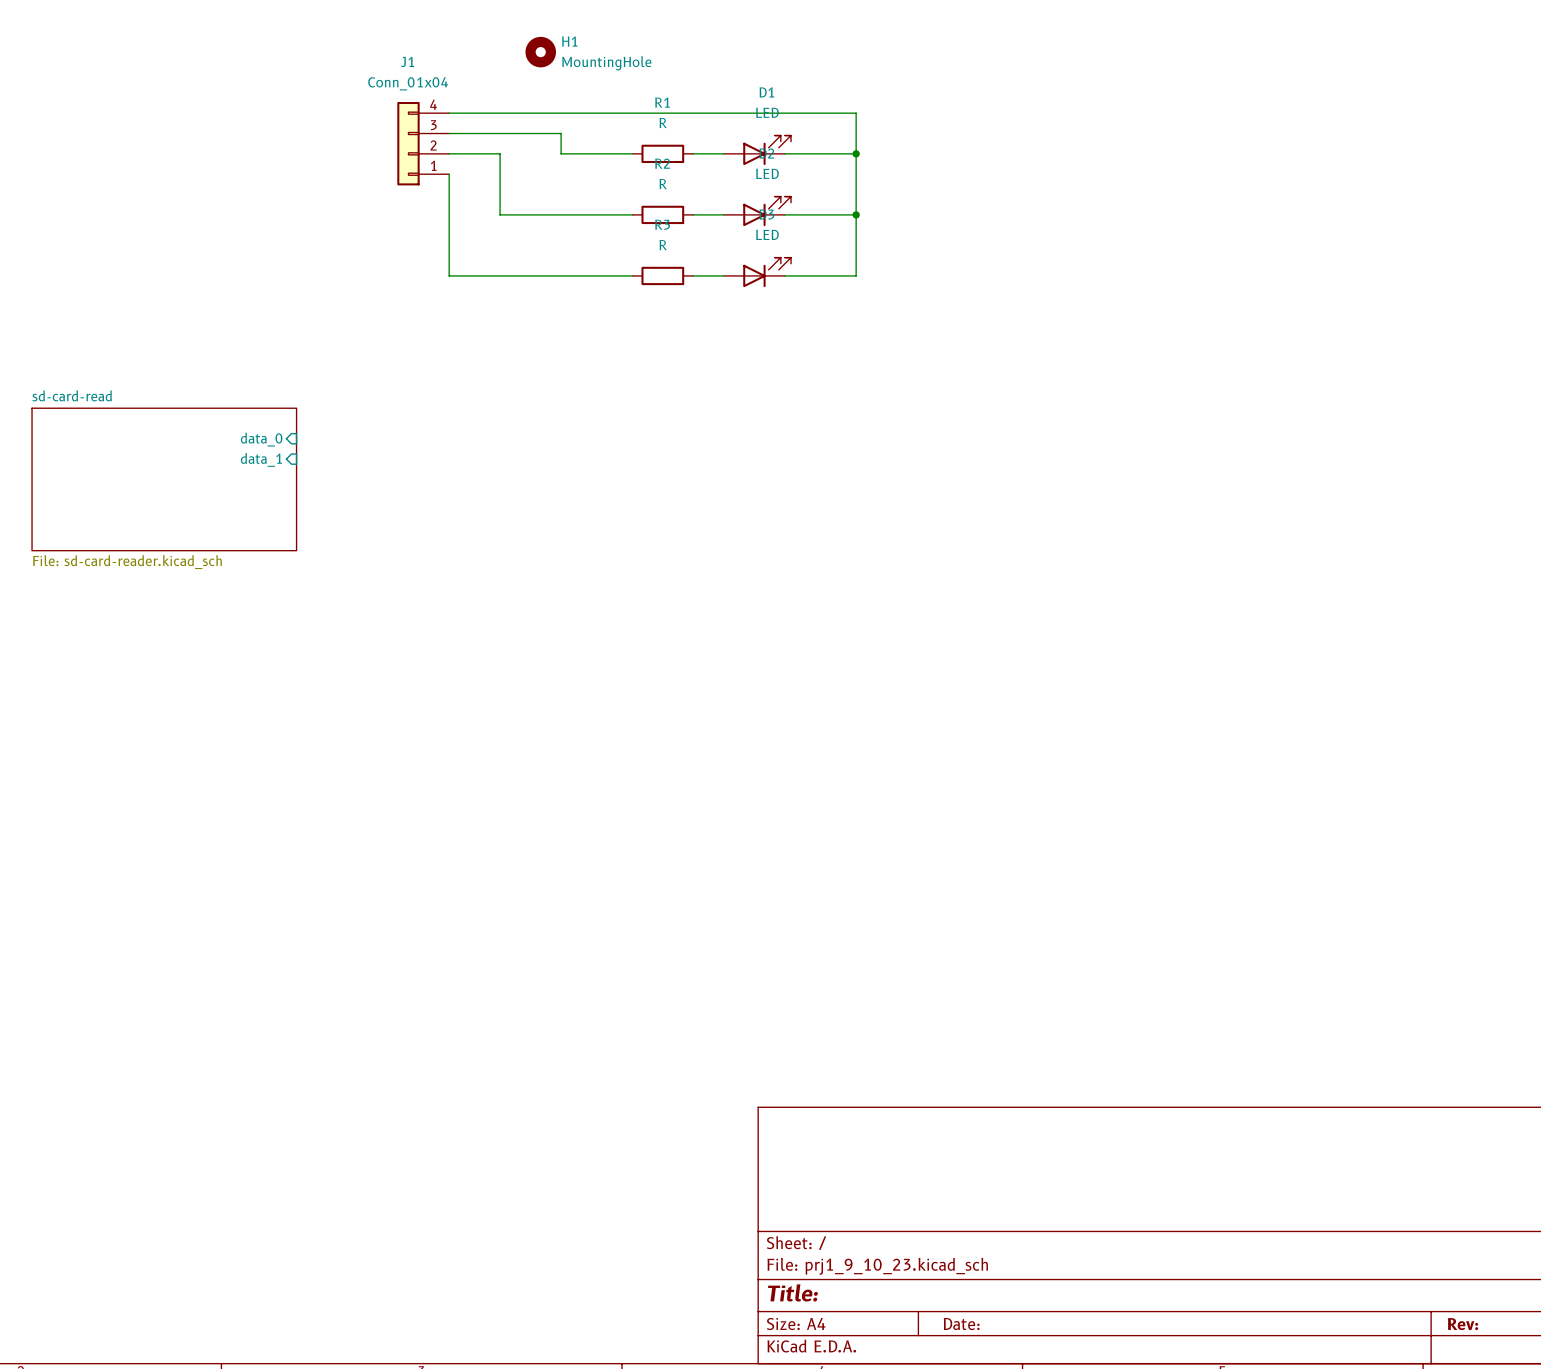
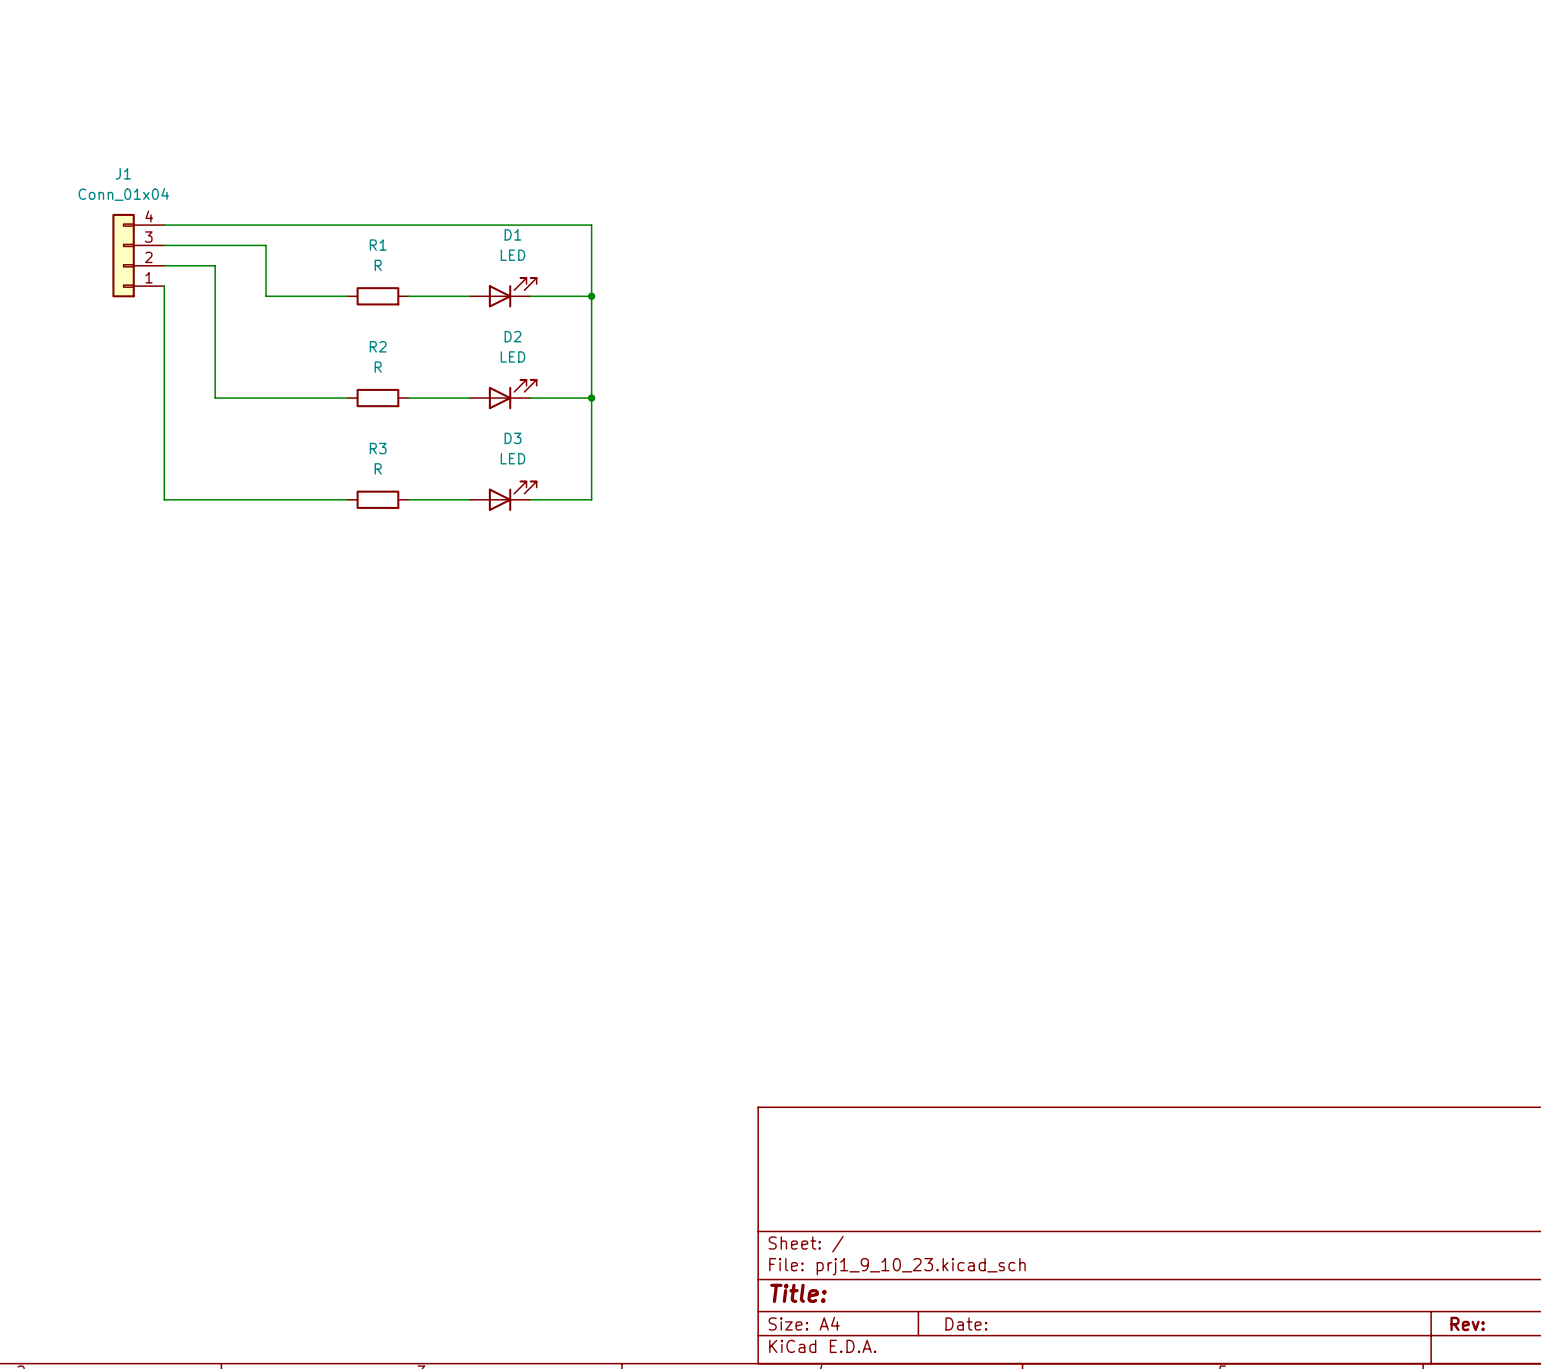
H1: MountingHole (540, 52) -> none
wire: (449, 113) (856, 113) (856, 275) (784, 275) -> none
wire: (449, 133) (561, 133) (561, 153) (632, 153) -> none
J1 position: (423, 143) -> (138, 255)
D1 position: (757, 150) -> (503, 292)
wire: (449, 153) (500, 153) (500, 214) (632, 214) -> none
R1 position: (662, 153) -> (377, 296)
wire: (693, 153) (723, 153) -> none
wire: (784, 153) (856, 153) -> none
junction: (856, 153) -> none
wire: (449, 174) (449, 275) (632, 275) -> none
D2 position: (757, 211) -> (503, 394)
R2 position: (662, 214) -> (377, 398)
wire: (693, 214) (723, 214) -> none
wire: (784, 214) (856, 214) -> none
junction: (856, 214) -> none
wire: none -> (164, 225) (591, 225) (591, 499) (530, 499)
wire: none -> (164, 245) (266, 245) (266, 296) (347, 296)
wire: none -> (164, 265) (215, 265) (215, 398) (347, 398)
D3 position: (757, 272) -> (503, 496)
R3 position: (662, 275) -> (377, 499)
wire: (693, 275) (723, 275) -> none
wire: none -> (164, 286) (164, 499) (347, 499)
wire: none -> (408, 296) (469, 296)
wire: none -> (530, 296) (591, 296)
junction: none -> (591, 296)
wire: none -> (408, 398) (469, 398)
wire: none -> (530, 398) (591, 398)
junction: none -> (591, 398)
sheet pin: data_0 (261, 439) -> none
sheet pin: data_1 (261, 459) -> none
sheet sd-card-read: File: sd-card-reader.kicad_sch (164, 479) -> none
wire: none -> (408, 499) (469, 499)

